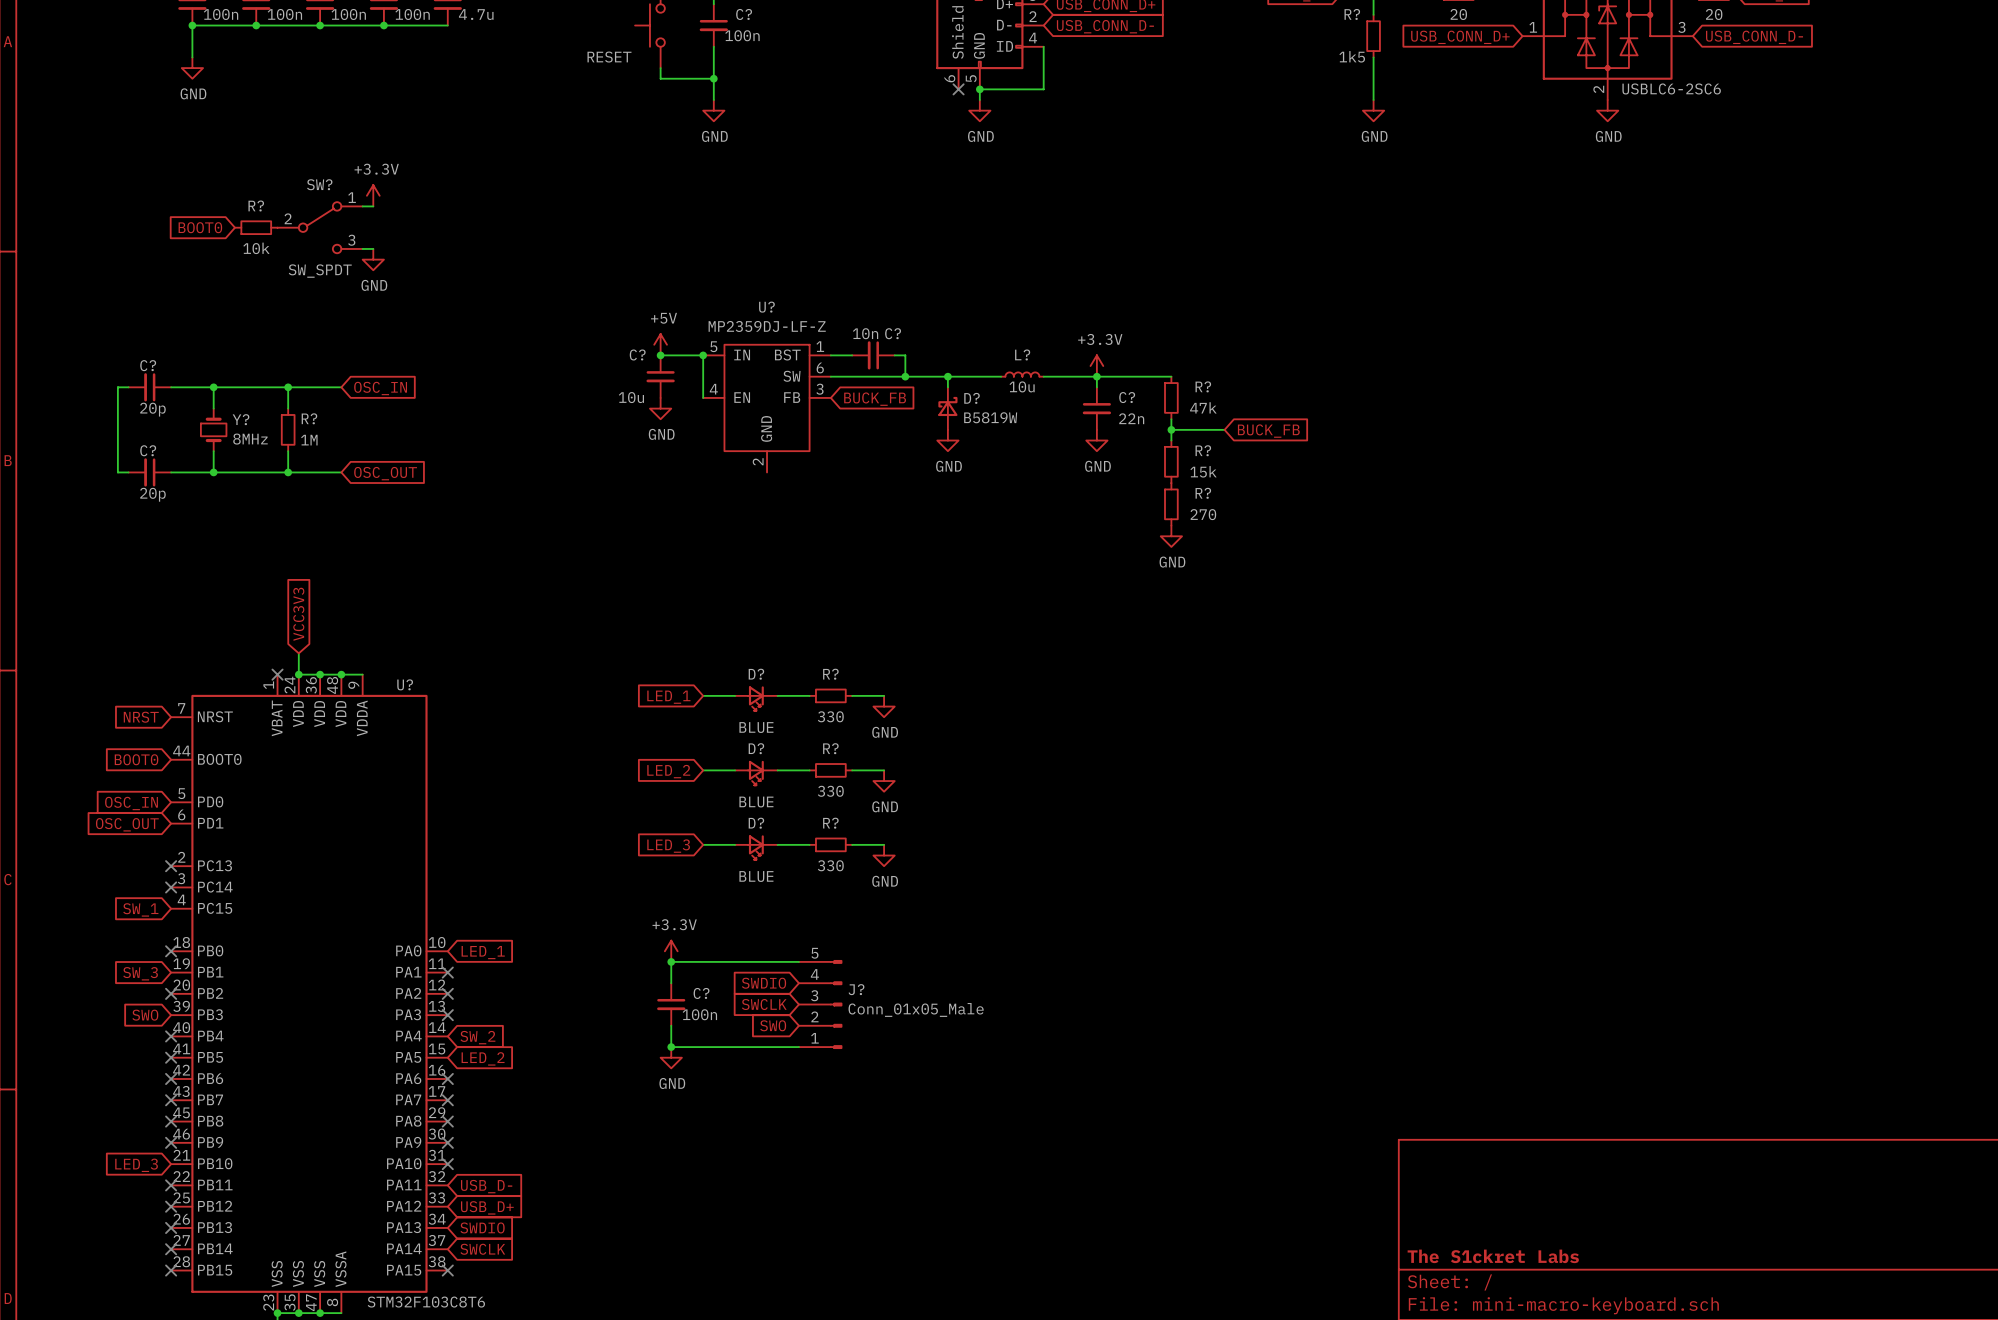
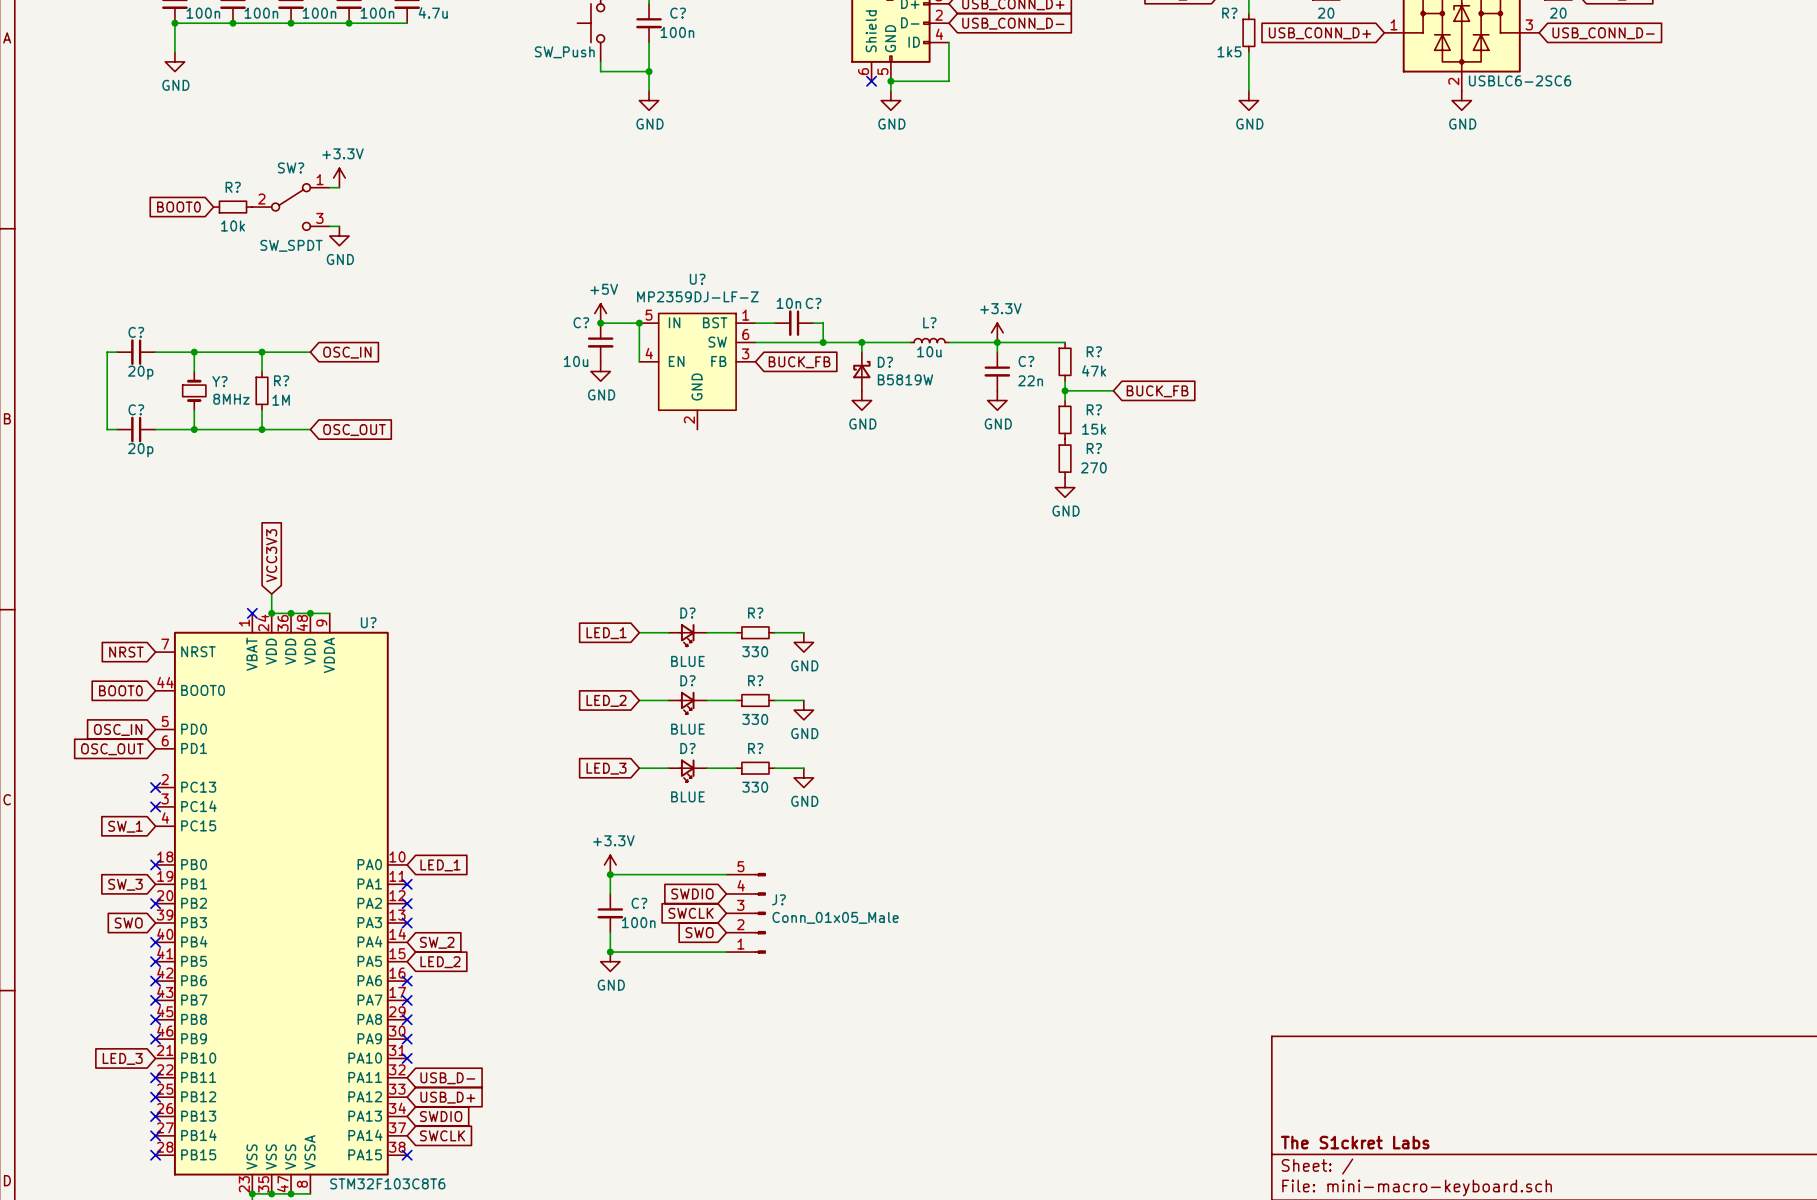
part value: RESET (609, 57) -> SW_Push (564, 52)

